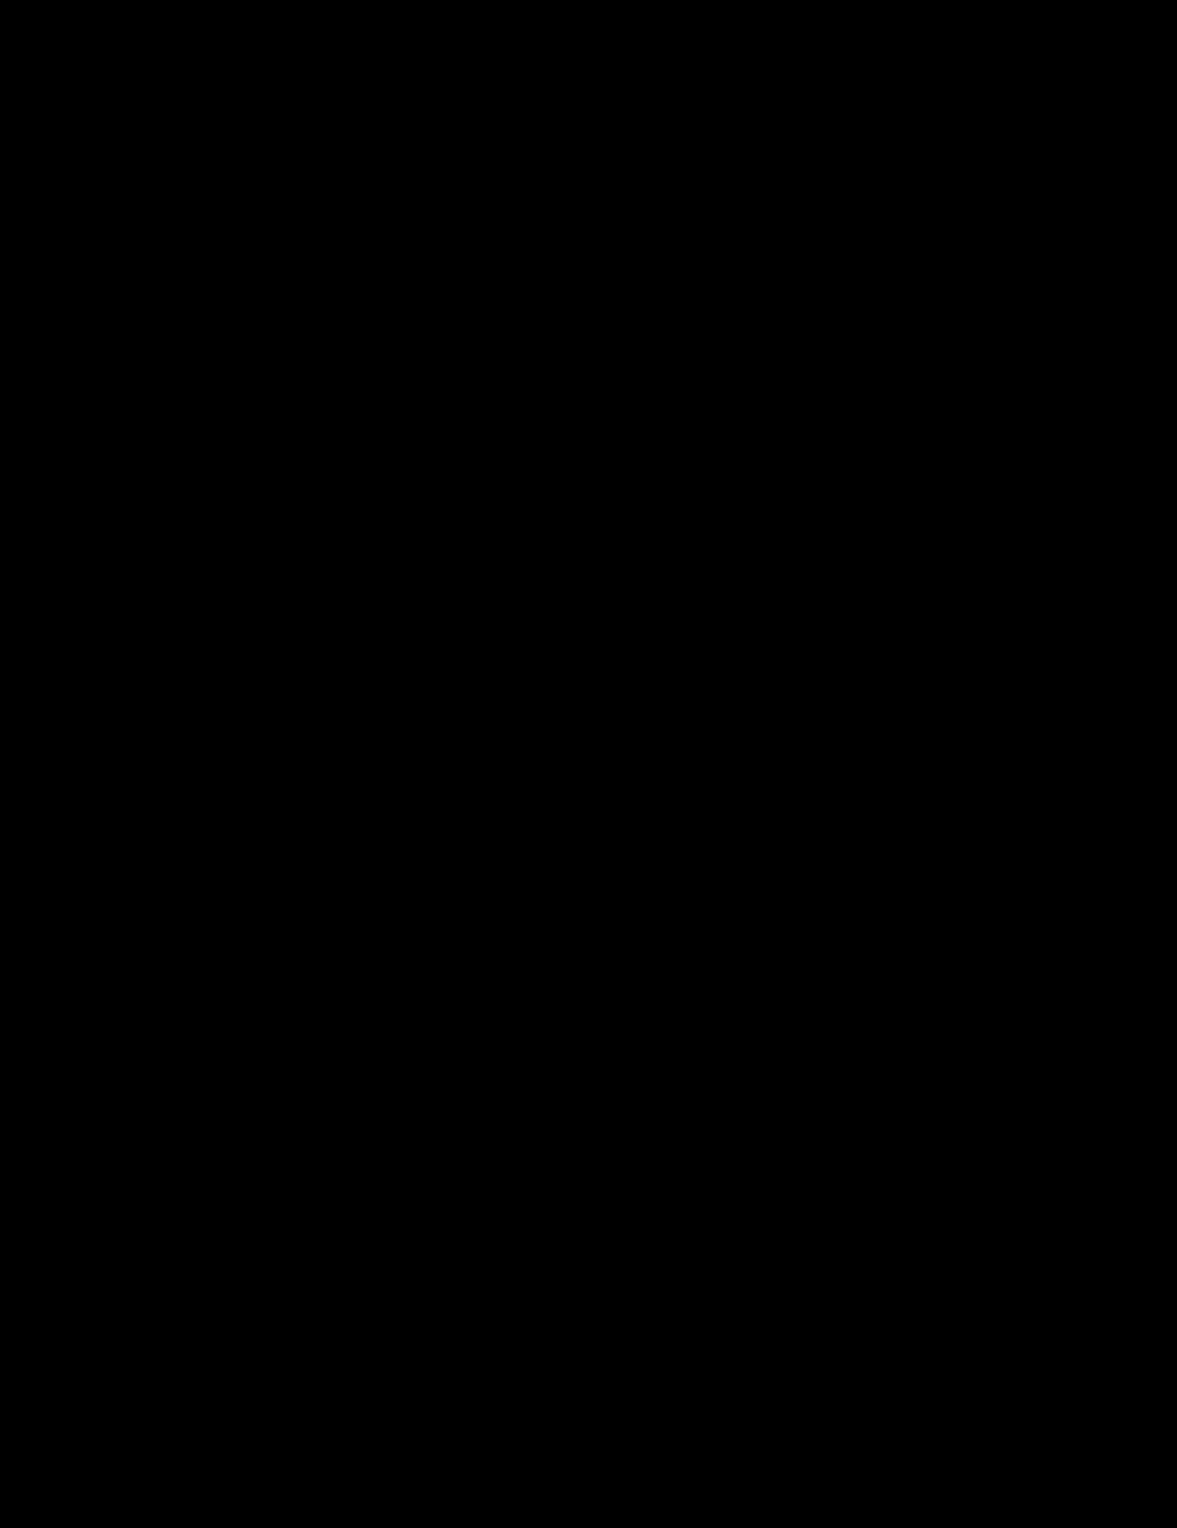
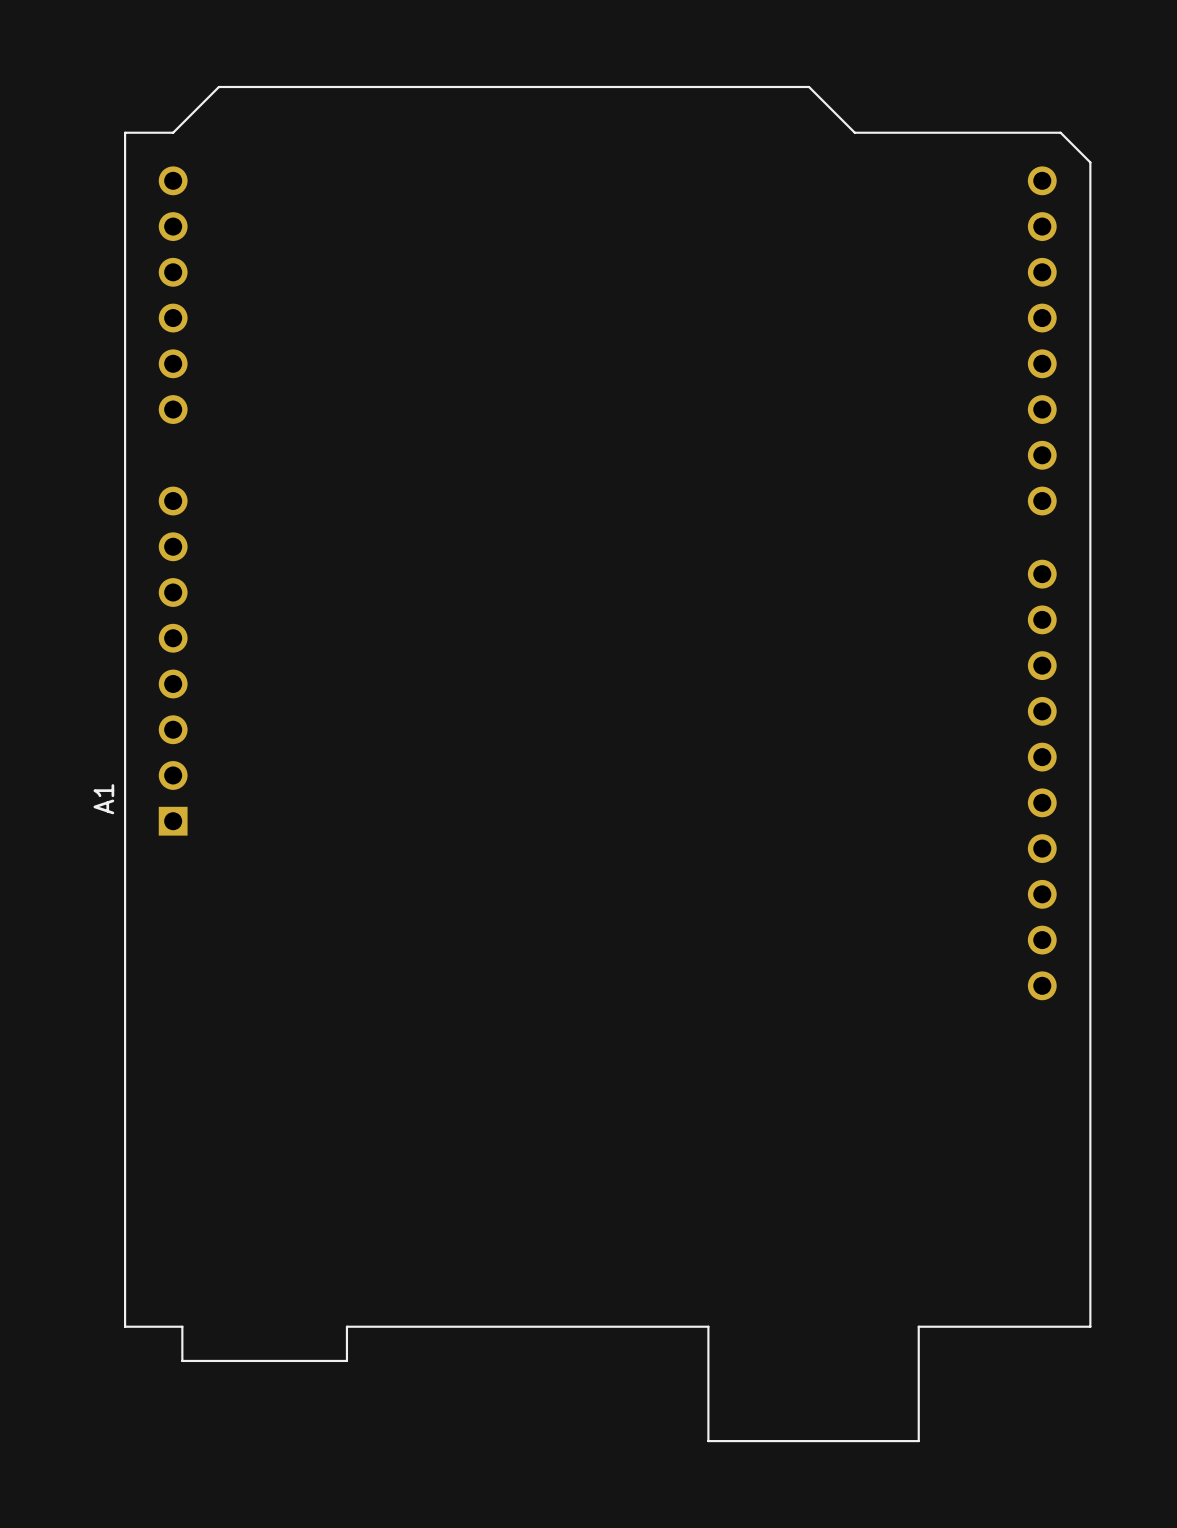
A1: none -> (607, 764)

